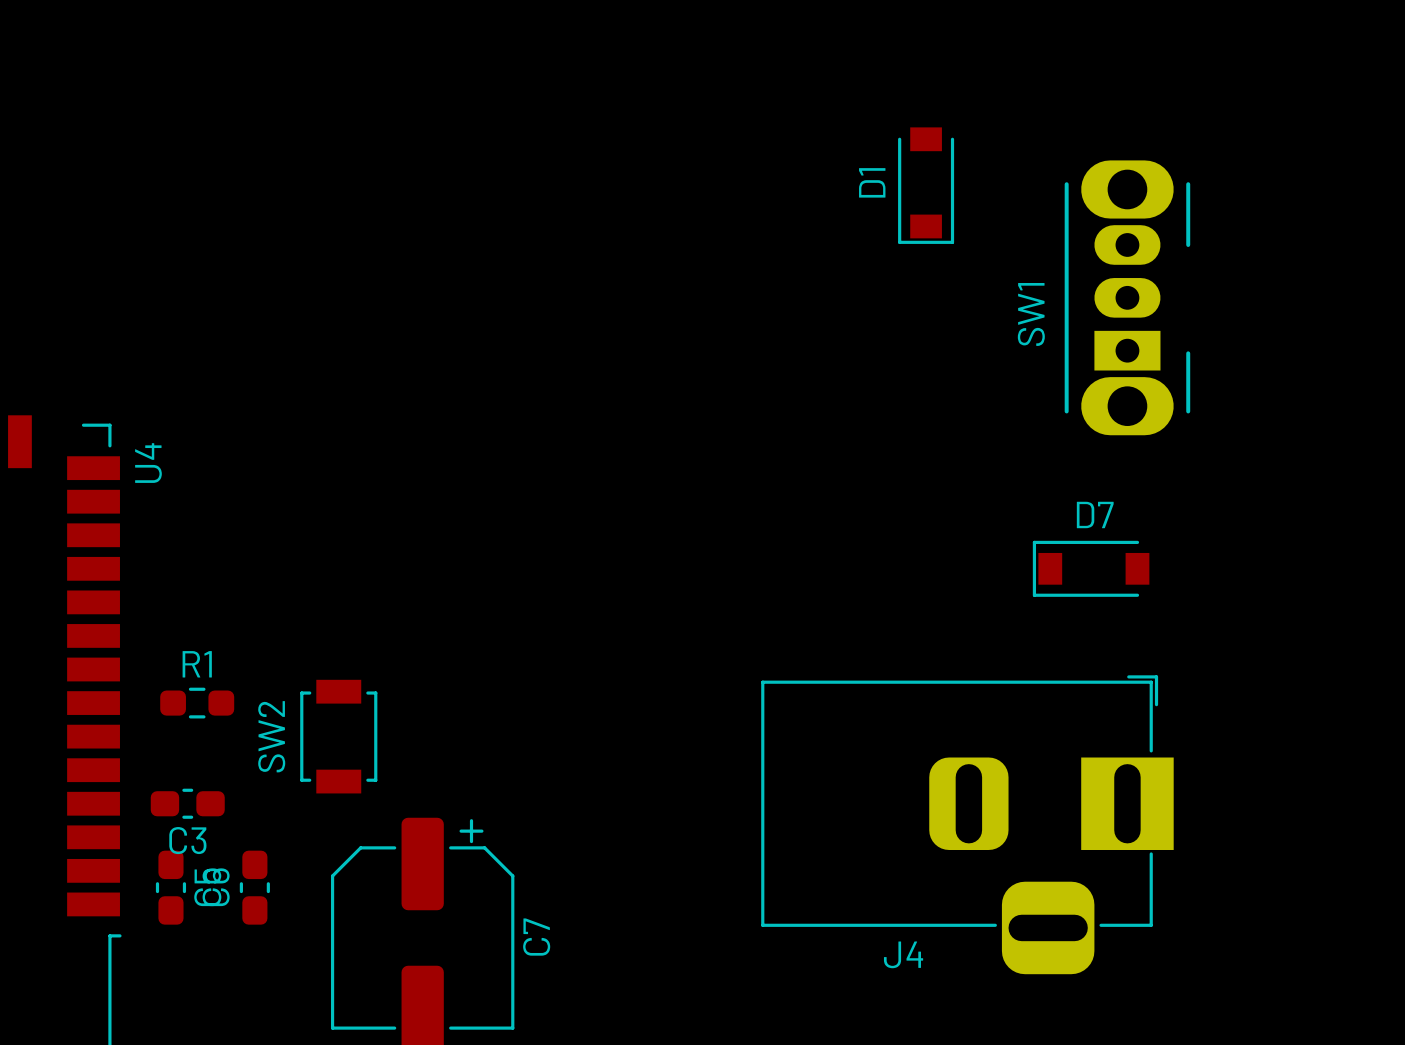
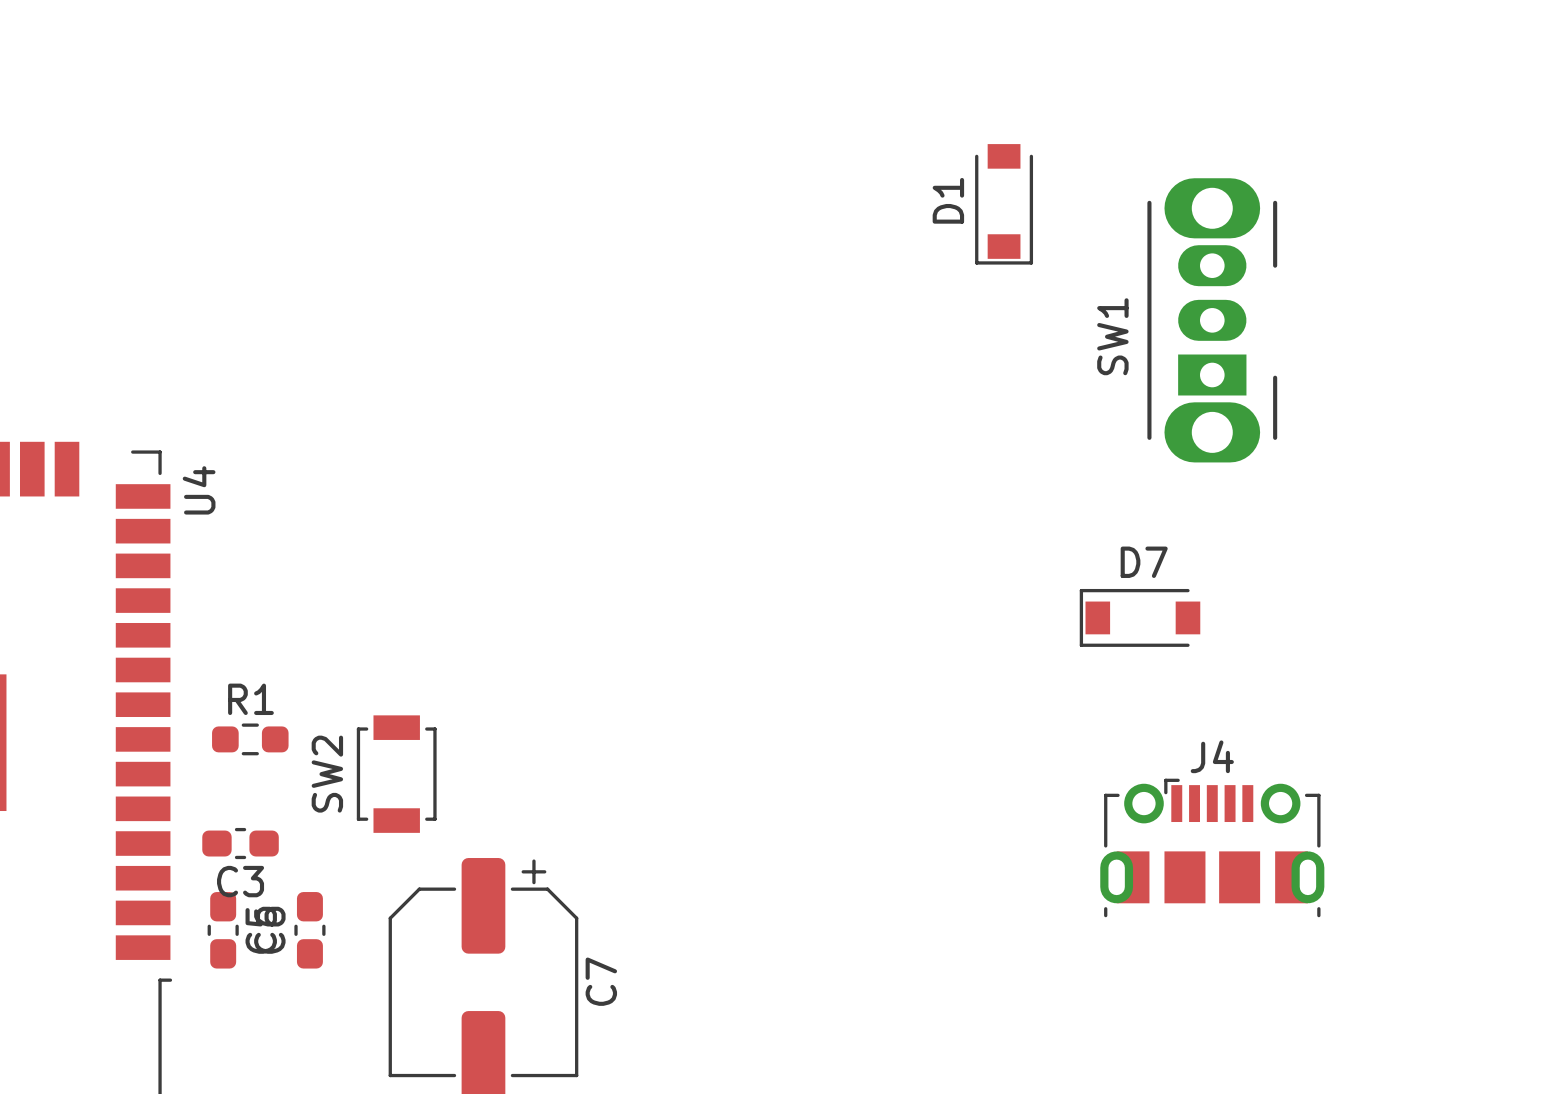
D7 position: (1091, 568) -> (1140, 617)
J4 footprint: [761, 675, 1174, 975] -> [1100, 778, 1325, 918]
J4 name position: J4 (903, 954) -> J4 (1212, 756)

